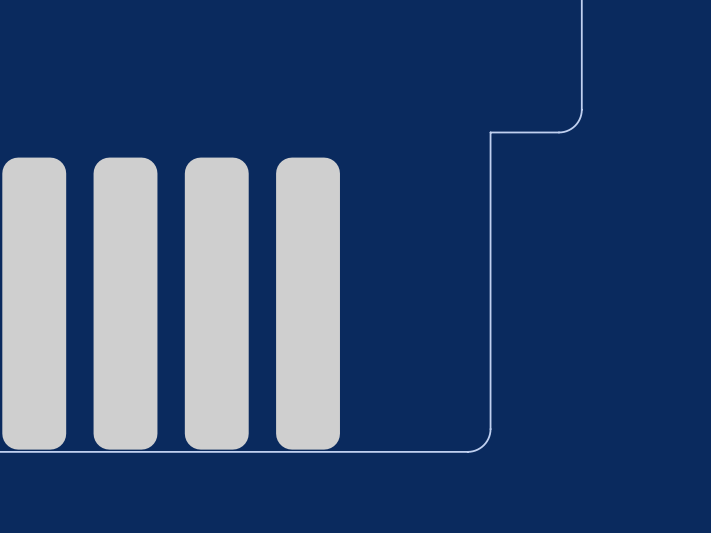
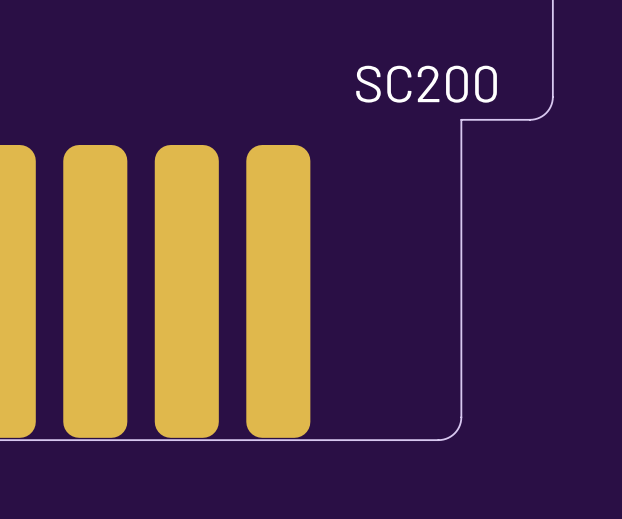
text: none -> SC200 (426, 84)

